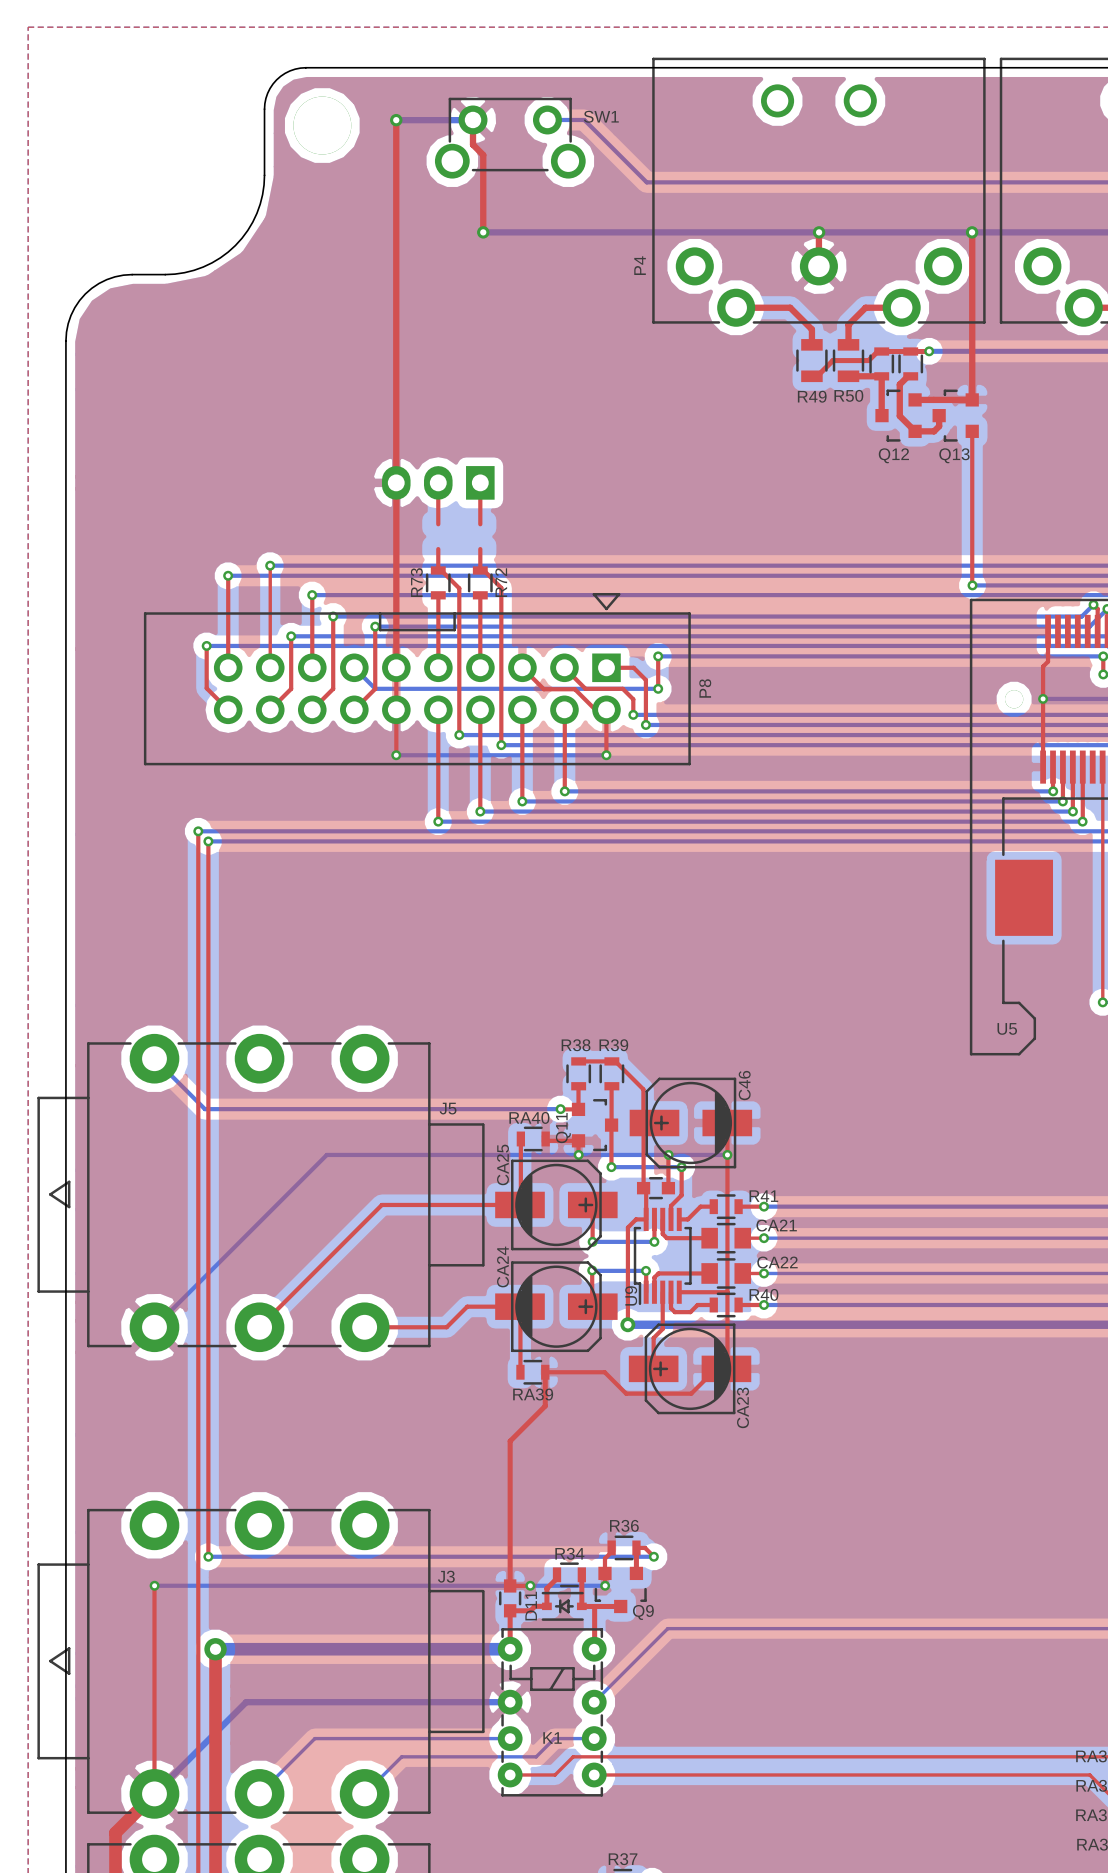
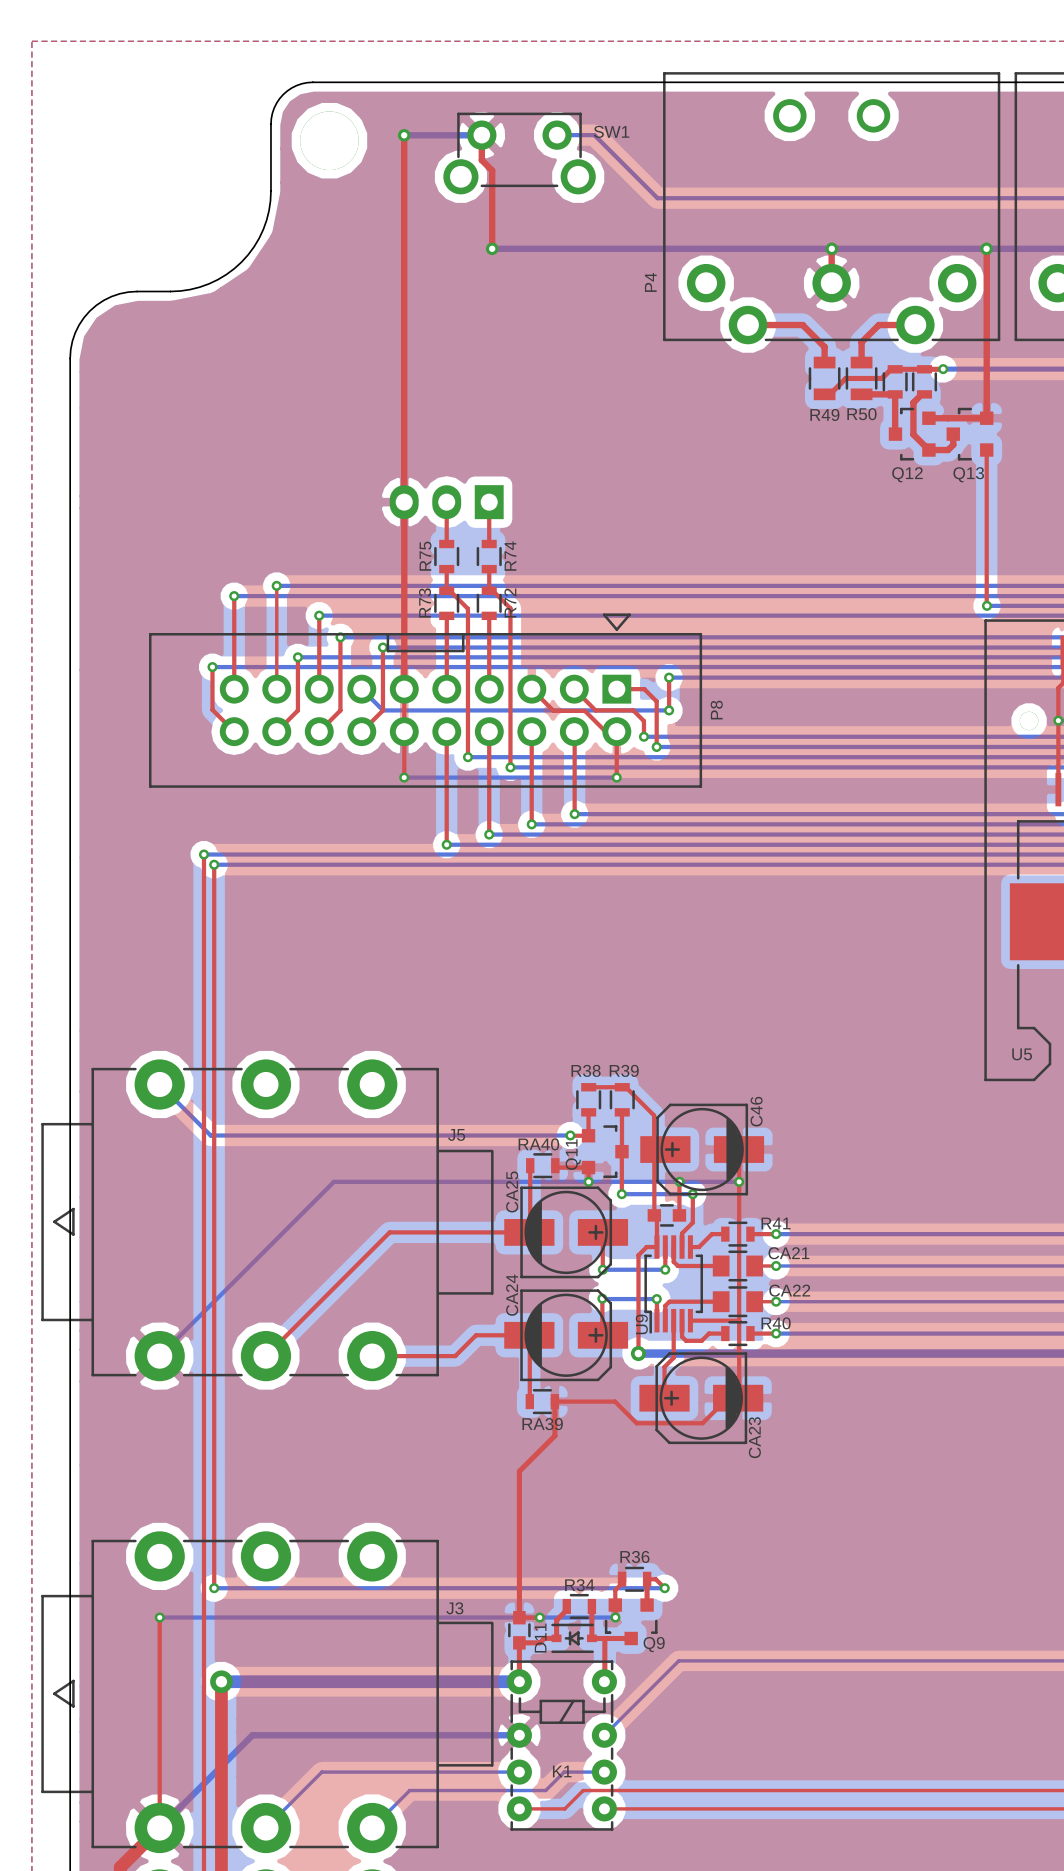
R75: none -> (446, 556)
R74: none -> (489, 556)

